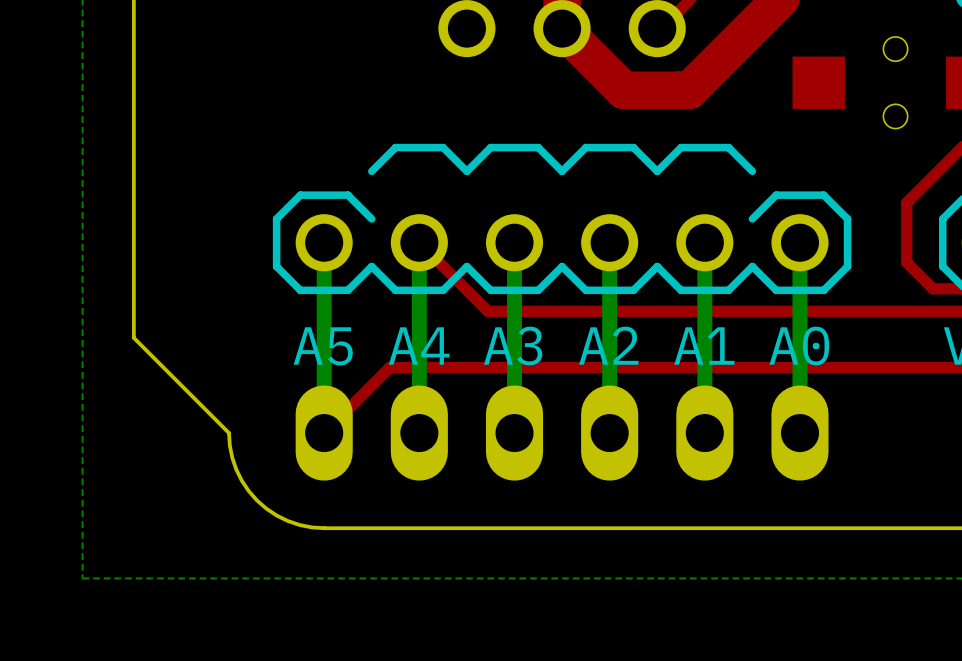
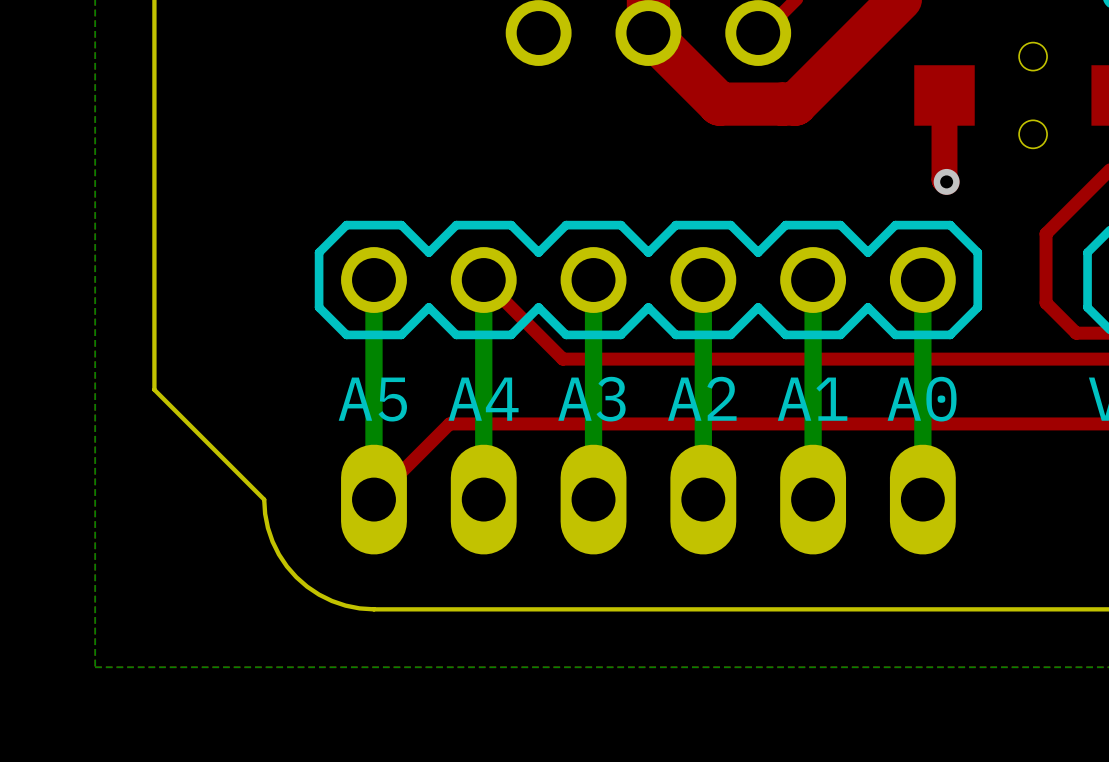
top track: none -> (944, 95) (944, 179) (946, 181)
via: none -> (946, 181)
line: (752, 171) (728, 147) (681, 147) (657, 171) (633, 147) (585, 147) (562, 171) (538, 147) (490, 147) (466, 171) (443, 147) (395, 147) (371, 171) -> (867, 252) (840, 225) (785, 225) (758, 252) (730, 225) (675, 225) (648, 252) (620, 225) (566, 225) (538, 252) (511, 225) (456, 225) (428, 252)

